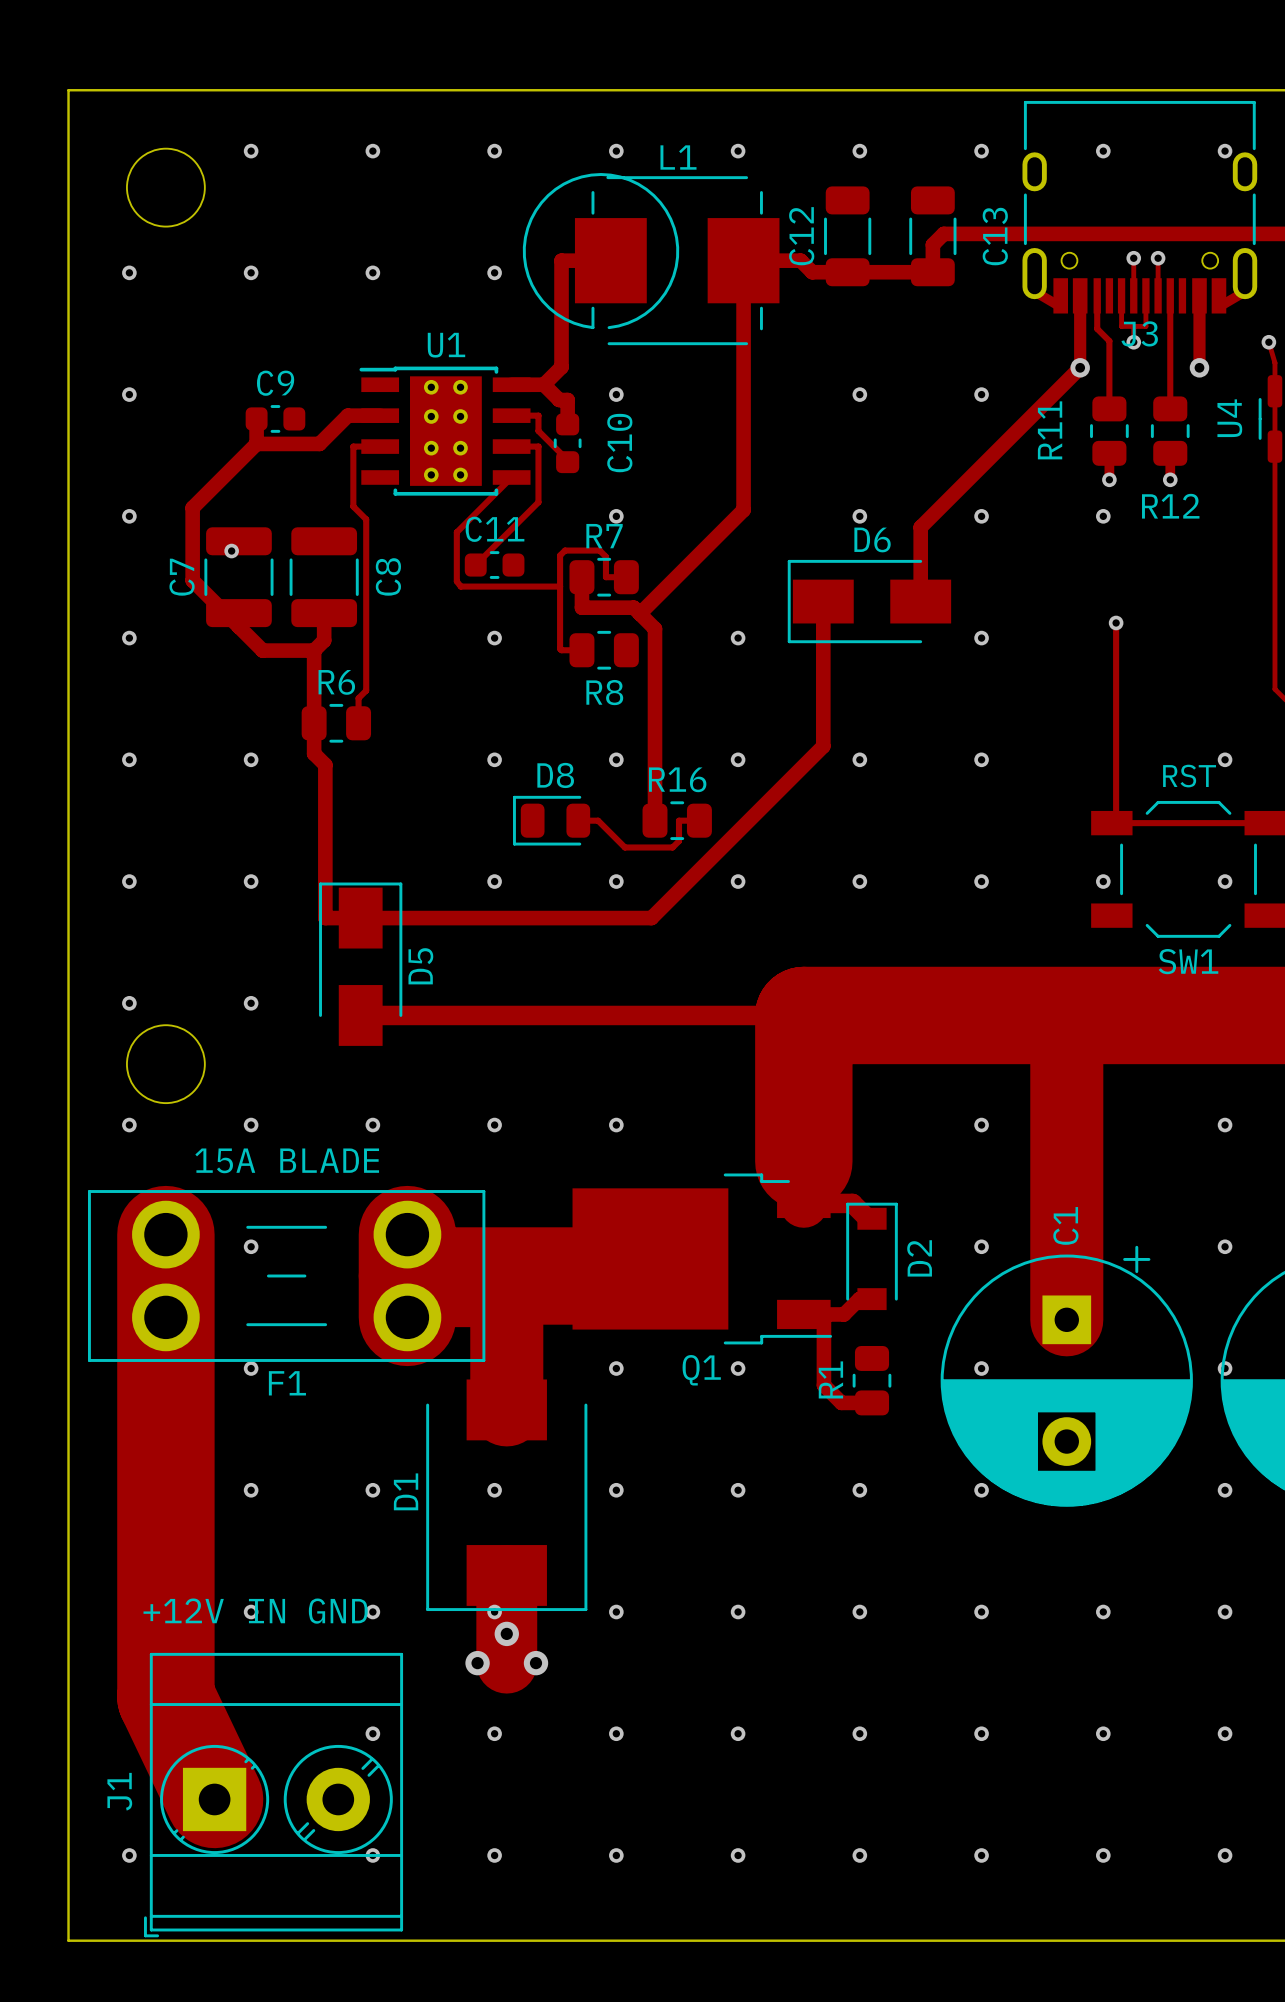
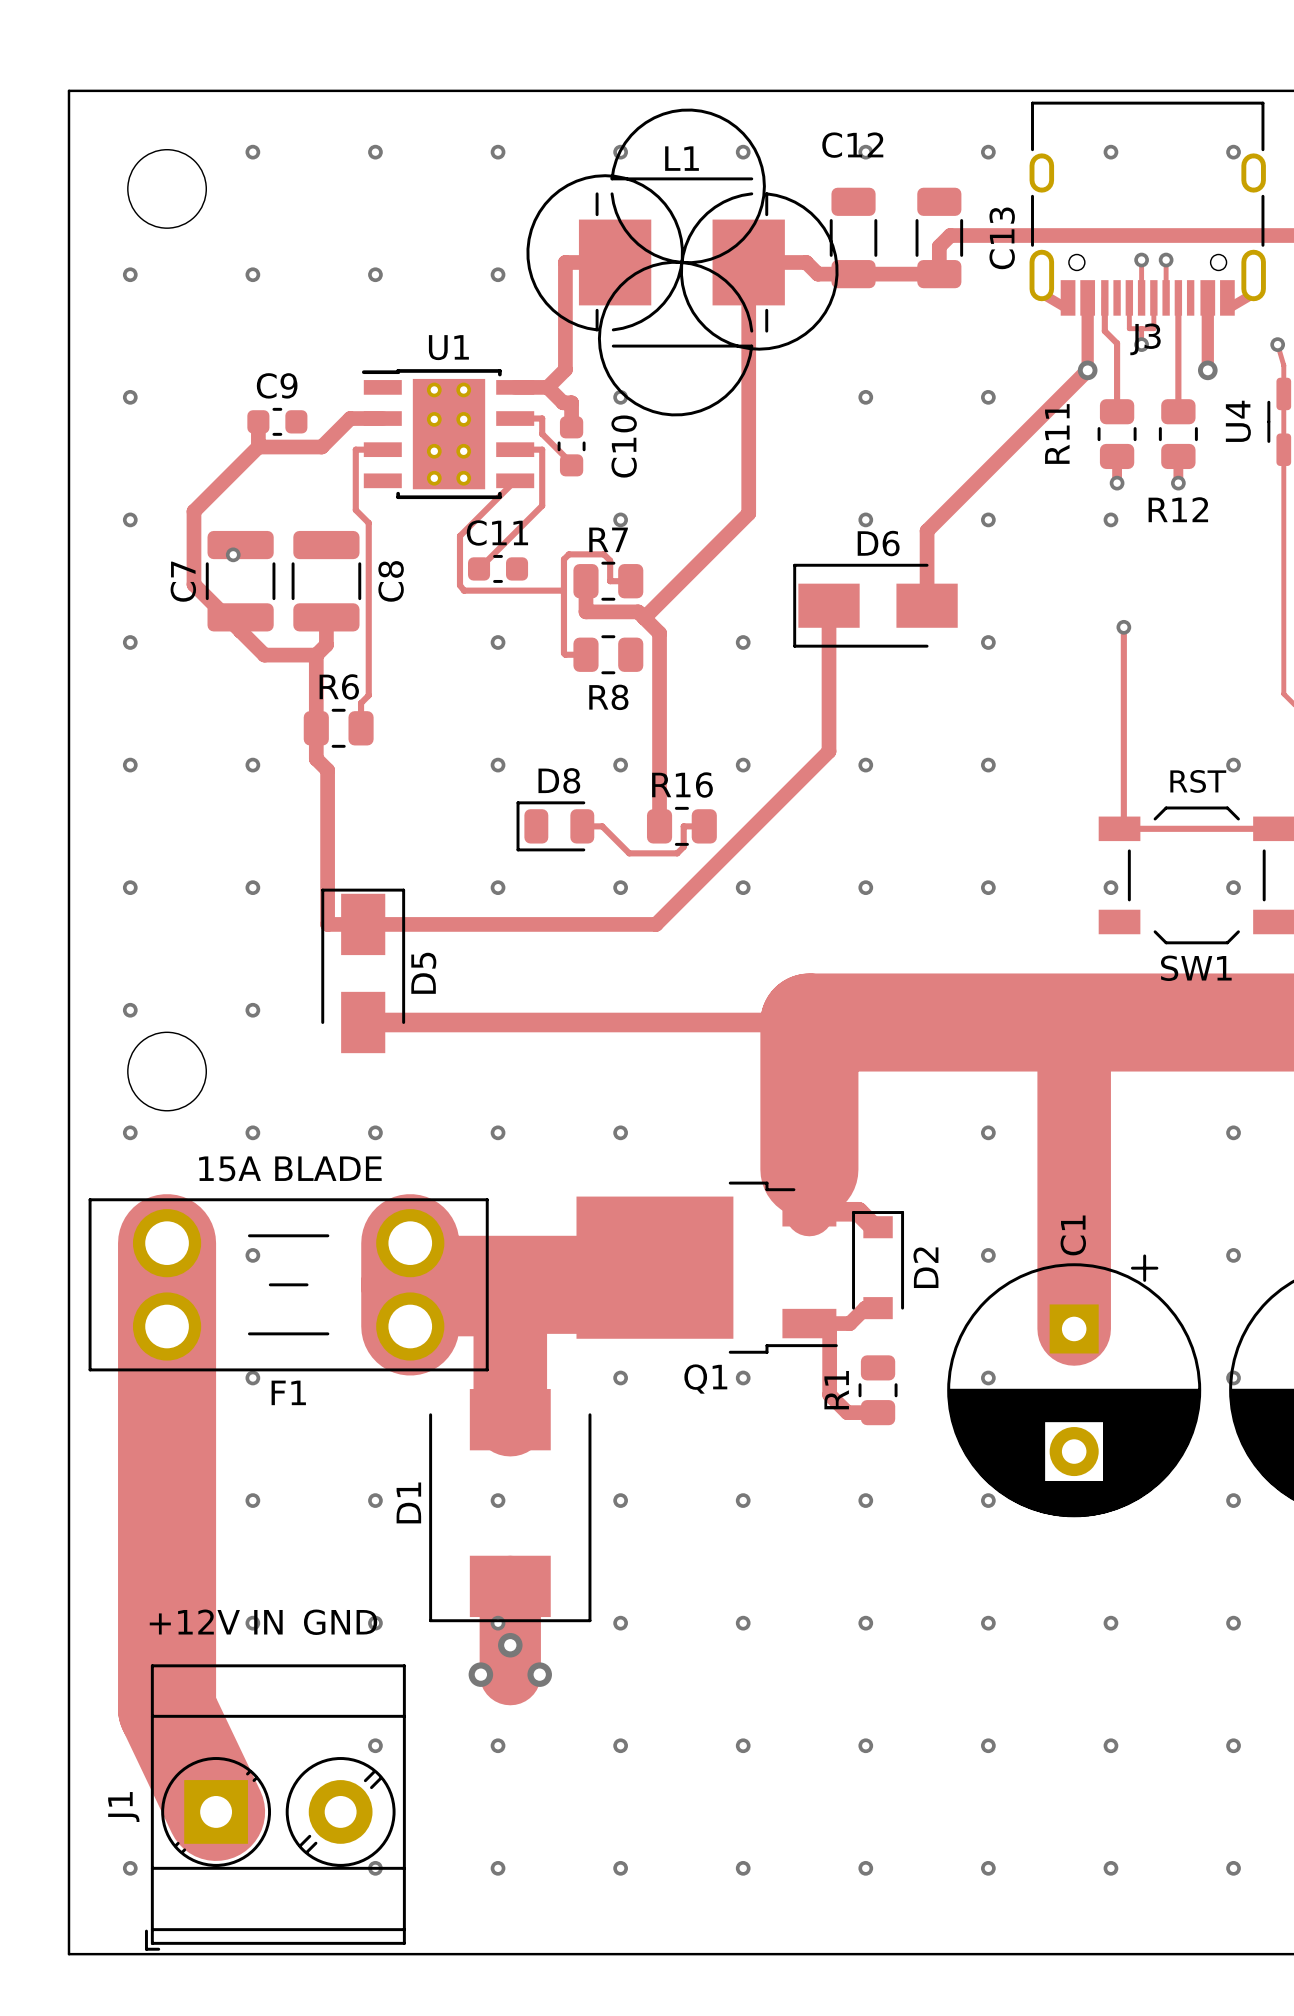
L1 footprint: [522, 173, 780, 346] -> [526, 108, 839, 417]
C12 name rotation: 0° (801, 236) -> 90° clockwise (852, 145)
C12 name position: C12 (801, 236) -> C12 (852, 145)

